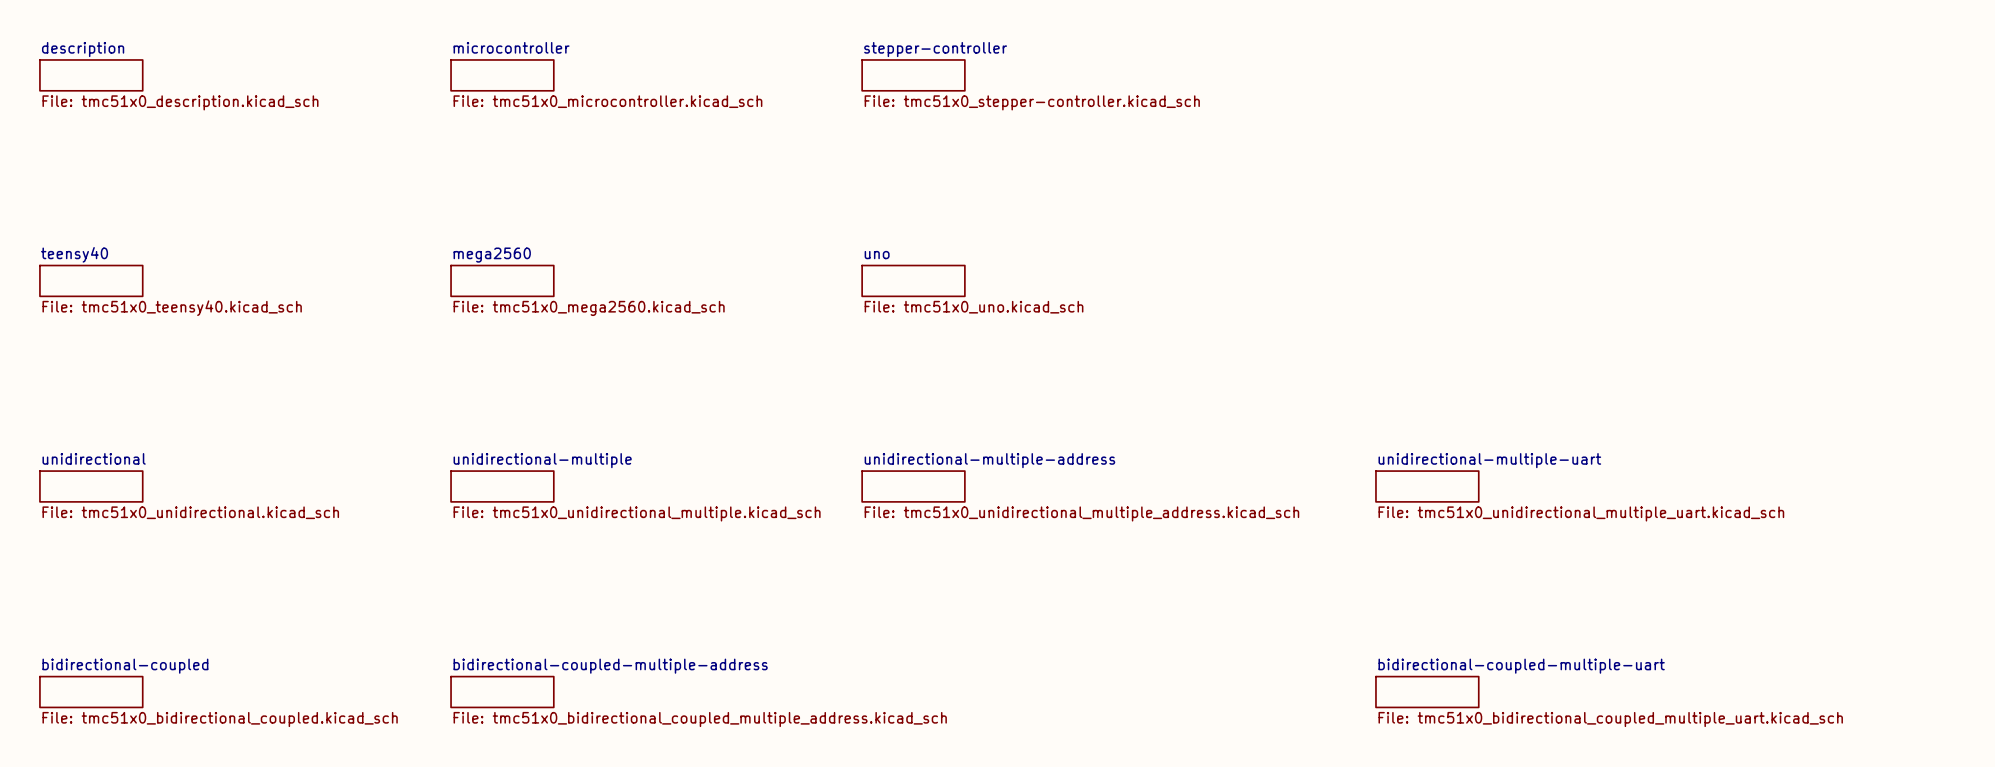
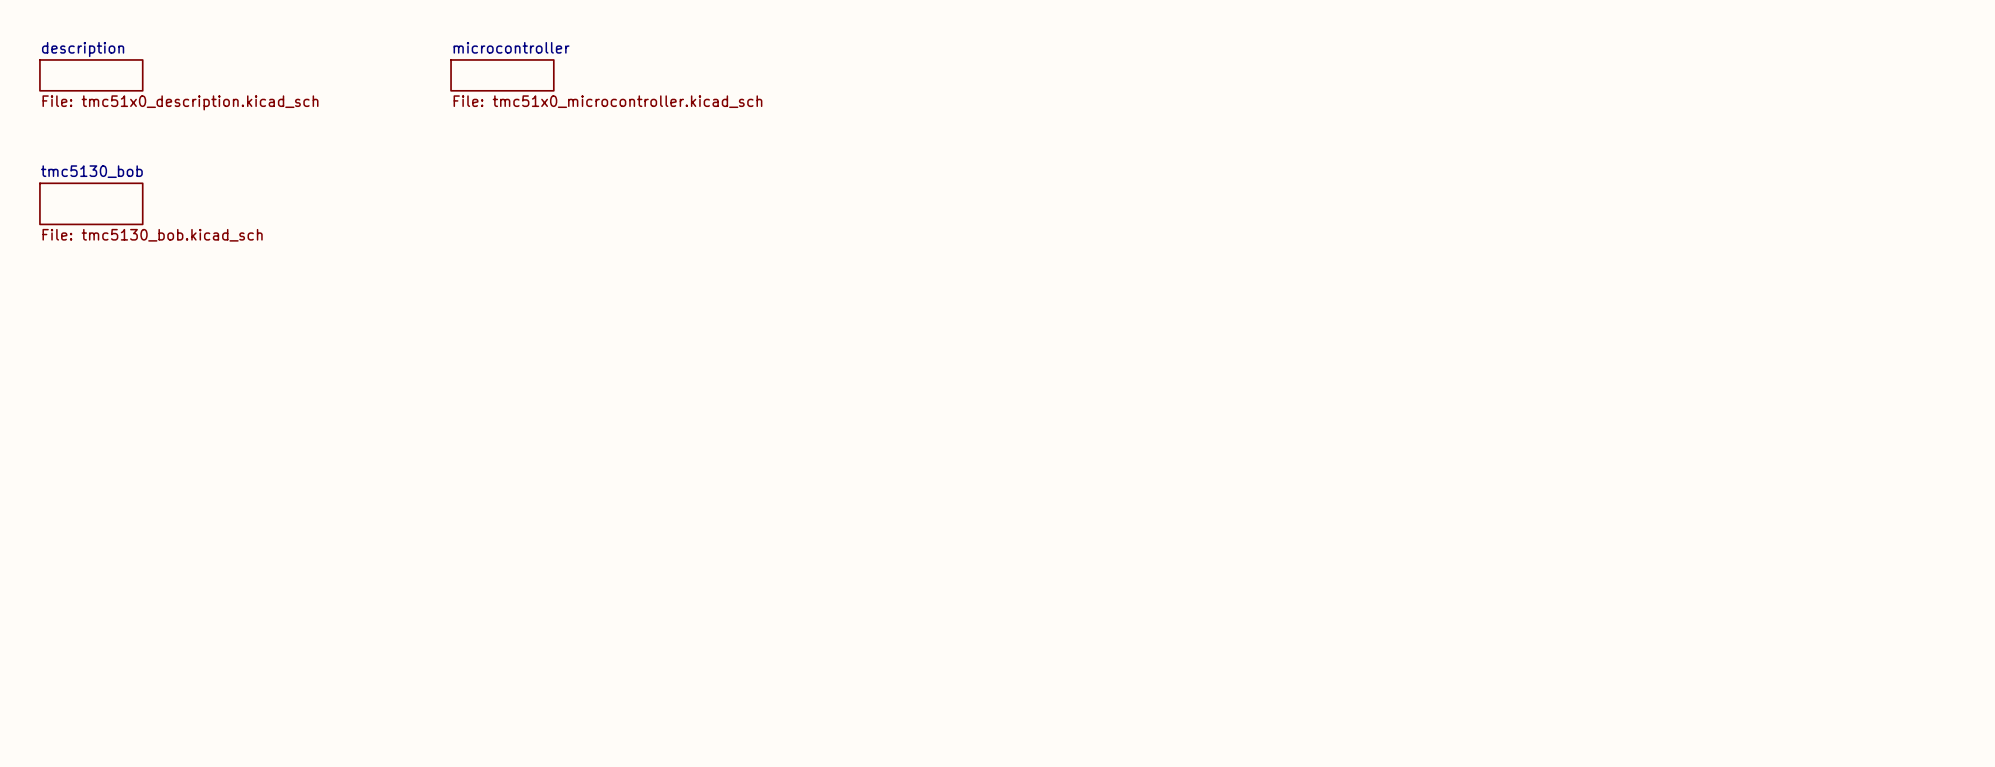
sheet stepper-controller: File: tmc51x0_stepper-controller.kicad_sch (913, 75) -> none
sheet tmc5130_bob: none -> File: tmc5130_bob.kicad_sch (91, 203)
sheet teensy40: File: tmc51x0_teensy40.kicad_sch (91, 280) -> none
sheet mega2560: File: tmc51x0_mega2560.kicad_sch (502, 280) -> none
sheet uno: File: tmc51x0_uno.kicad_sch (913, 280) -> none
sheet unidirectional: File: tmc51x0_unidirectional.kicad_sch (91, 486) -> none
sheet unidirectional-multiple: File: tmc51x0_unidirectional_multiple.kicad_sch (502, 486) -> none
sheet unidirectional-multiple-address: File: tmc51x0_unidirectional_multiple_address.kicad_sch (913, 486) -> none
sheet unidirectional-multiple-uart: File: tmc51x0_unidirectional_multiple_uart.kicad_sch (1427, 486) -> none
sheet bidirectional-coupled: File: tmc51x0_bidirectional_coupled.kicad_sch (91, 692) -> none
sheet bidirectional-coupled-multiple-address: File: tmc51x0_bidirectional_coupled_multiple_address.kicad_sch (502, 692) -> none
sheet bidirectional-coupled-multiple-uart: File: tmc51x0_bidirectional_coupled_multiple_uart.kicad_sch (1427, 692) -> none

